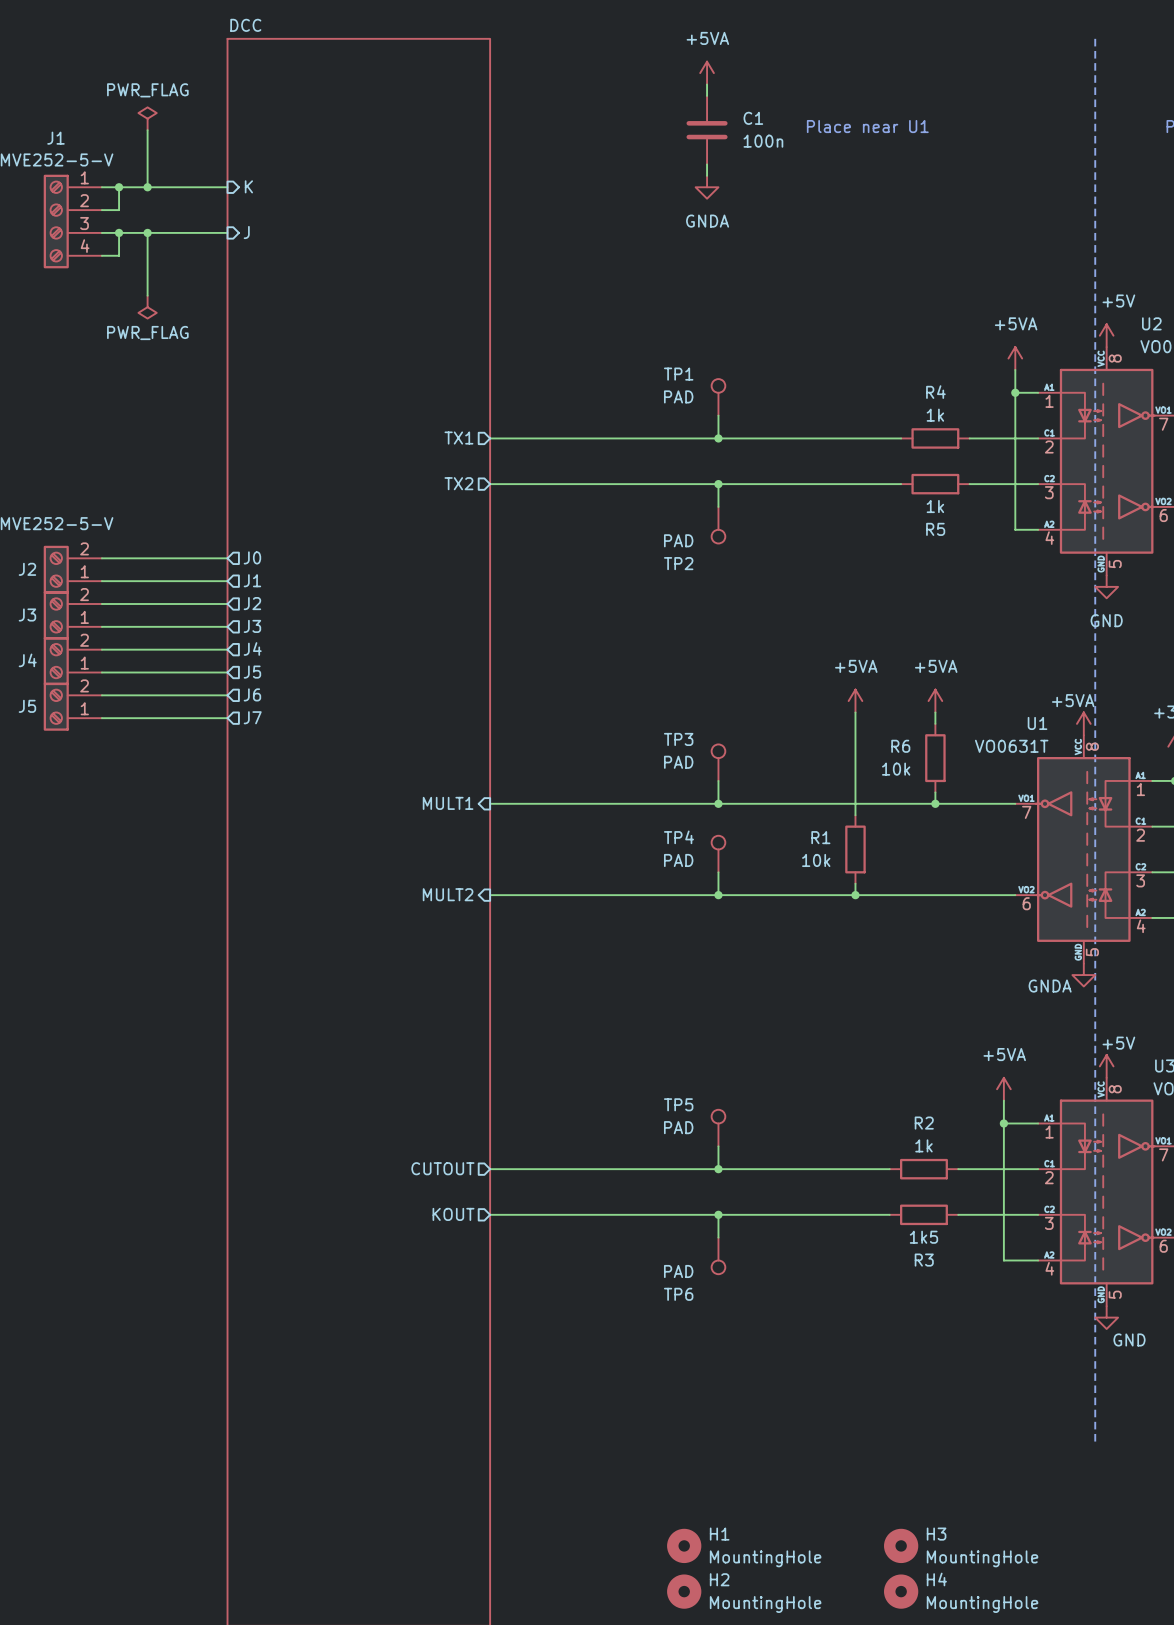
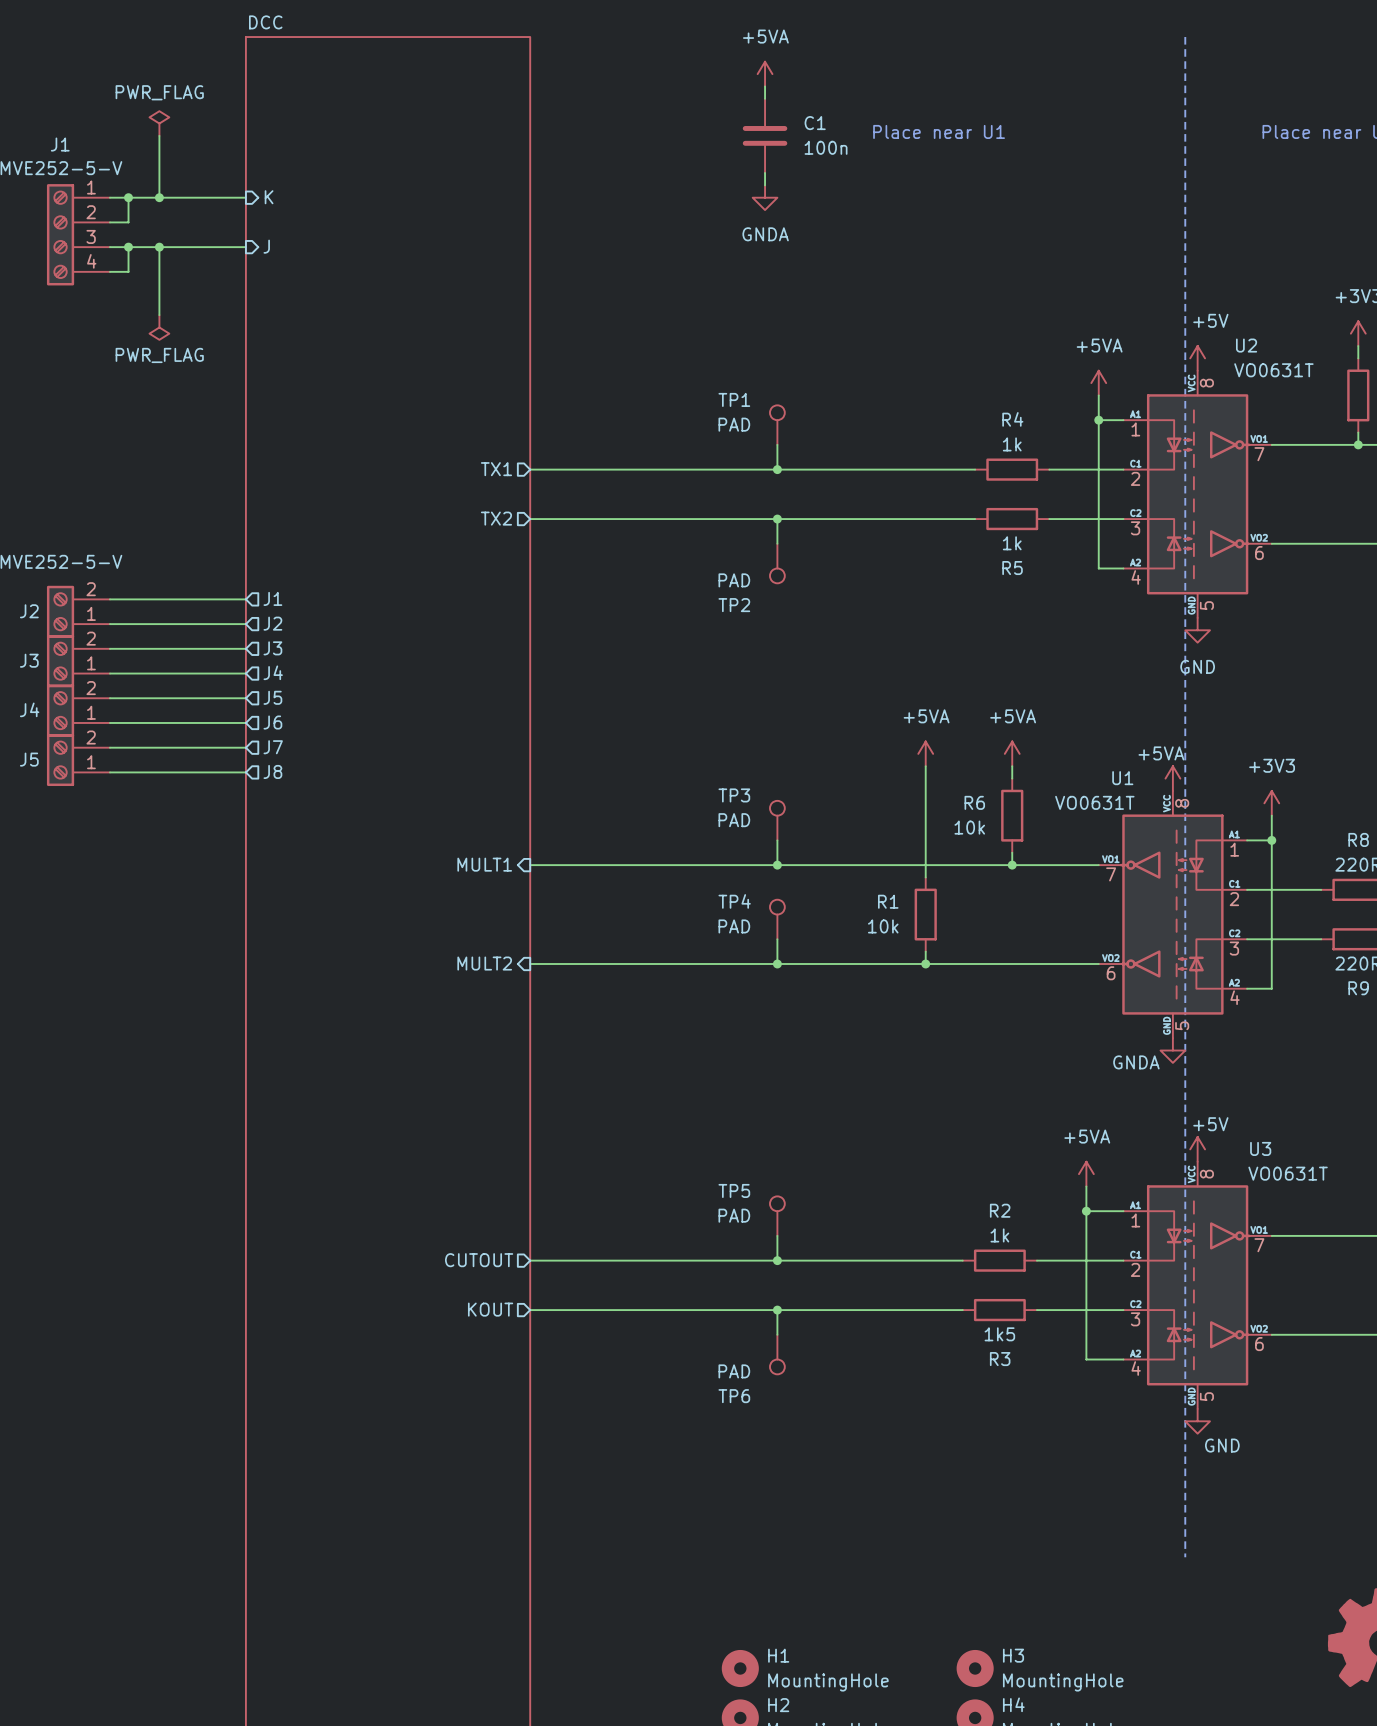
sheet pin: J0 (252, 557) -> J1 (272, 598)
sheet pin: J1 (252, 580) -> J2 (272, 623)
sheet pin: J2 (252, 603) -> J3 (272, 648)
sheet pin: J3 (252, 626) -> J4 (273, 672)
sheet pin: J4 (252, 648) -> J5 (272, 697)
sheet pin: J5 (252, 672) -> J6 (272, 722)
sheet pin: J6 (252, 694) -> J7 (273, 747)
sheet pin: J7 (252, 717) -> J8 (272, 771)

